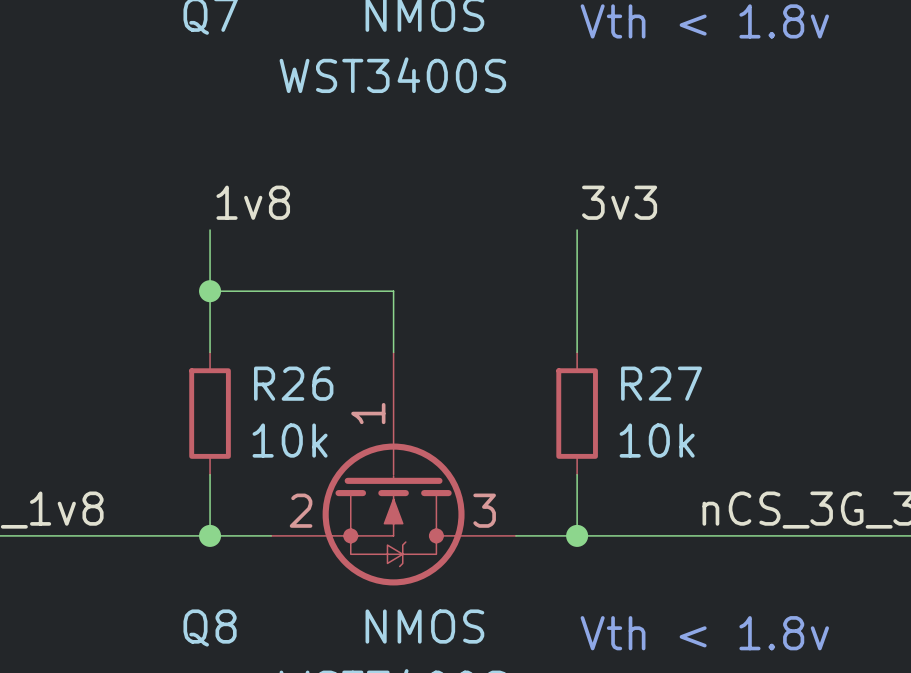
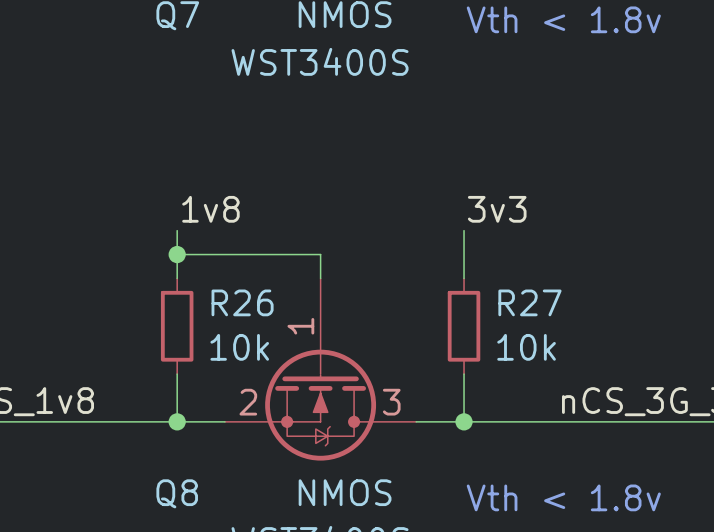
label position: 1v8 (253, 202) -> 1v8 (210, 209)
label position: 3v3 (619, 202) -> 3v3 (497, 209)
wire: (210, 230) (210, 291) (393, 291) (393, 321) -> (177, 254) (320, 254)
wire: (577, 230) (577, 291) -> none
junction position: (210, 291) -> (177, 254)

